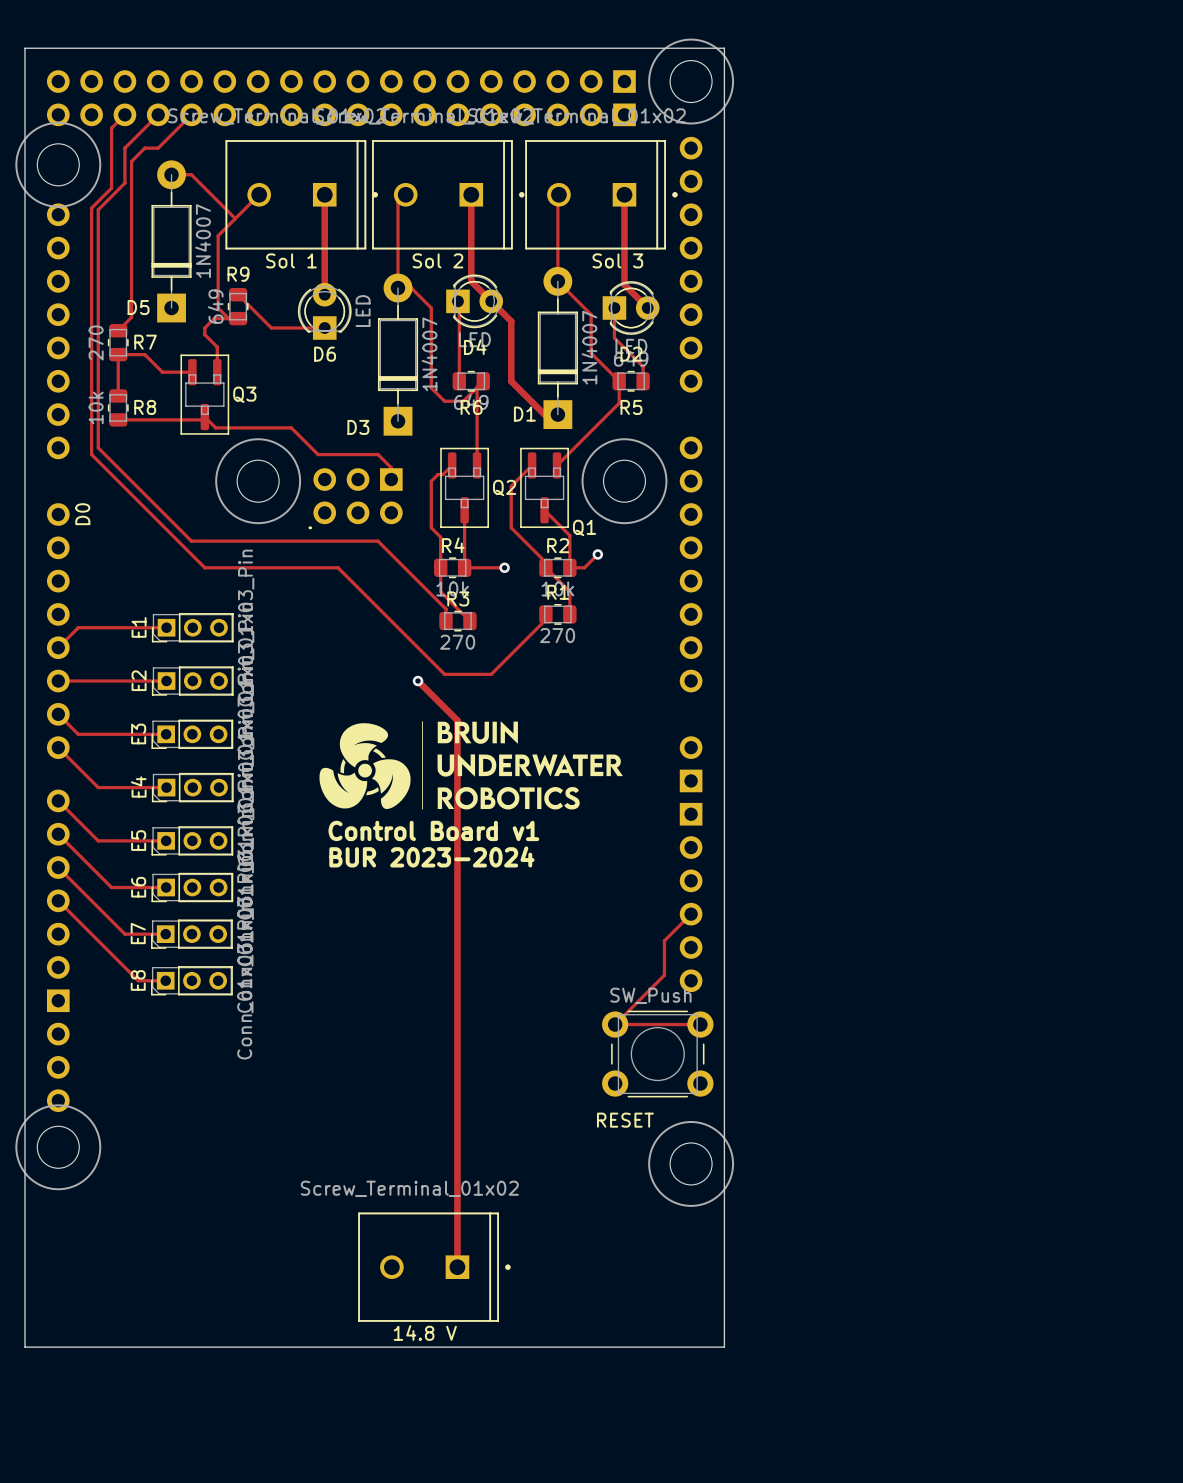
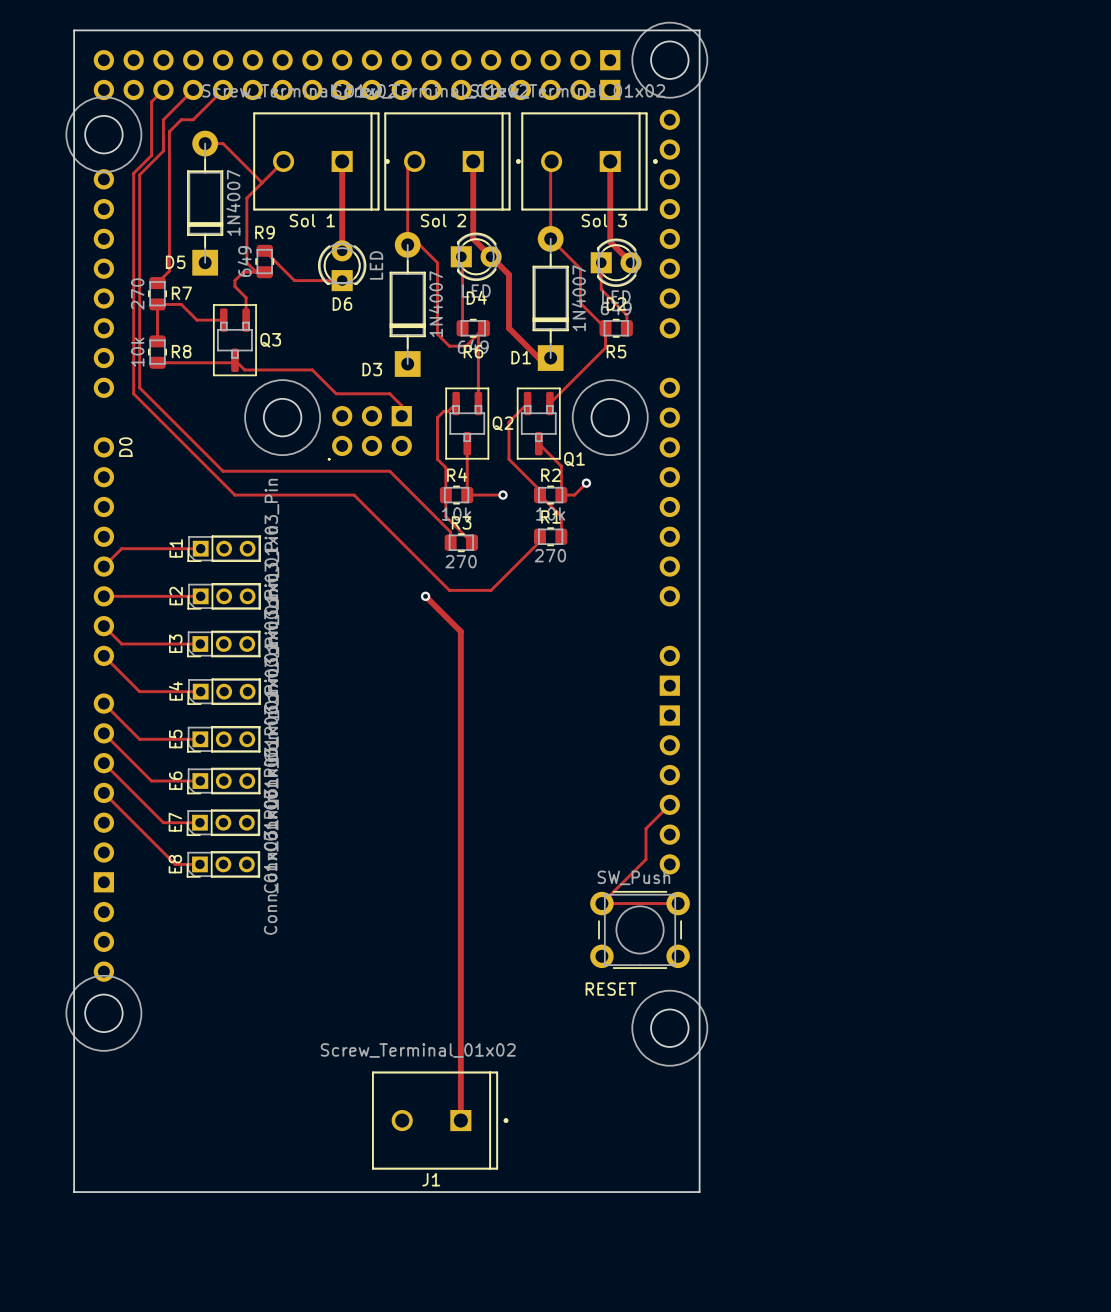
drawing: [319, 721, 623, 810] -> none
text: Control Board v1 (433, 830) -> none
text: BUR 2023-2024 (431, 856) -> none
14.8 V name: 14.8 V (425, 1332) -> J1 (431, 1179)

